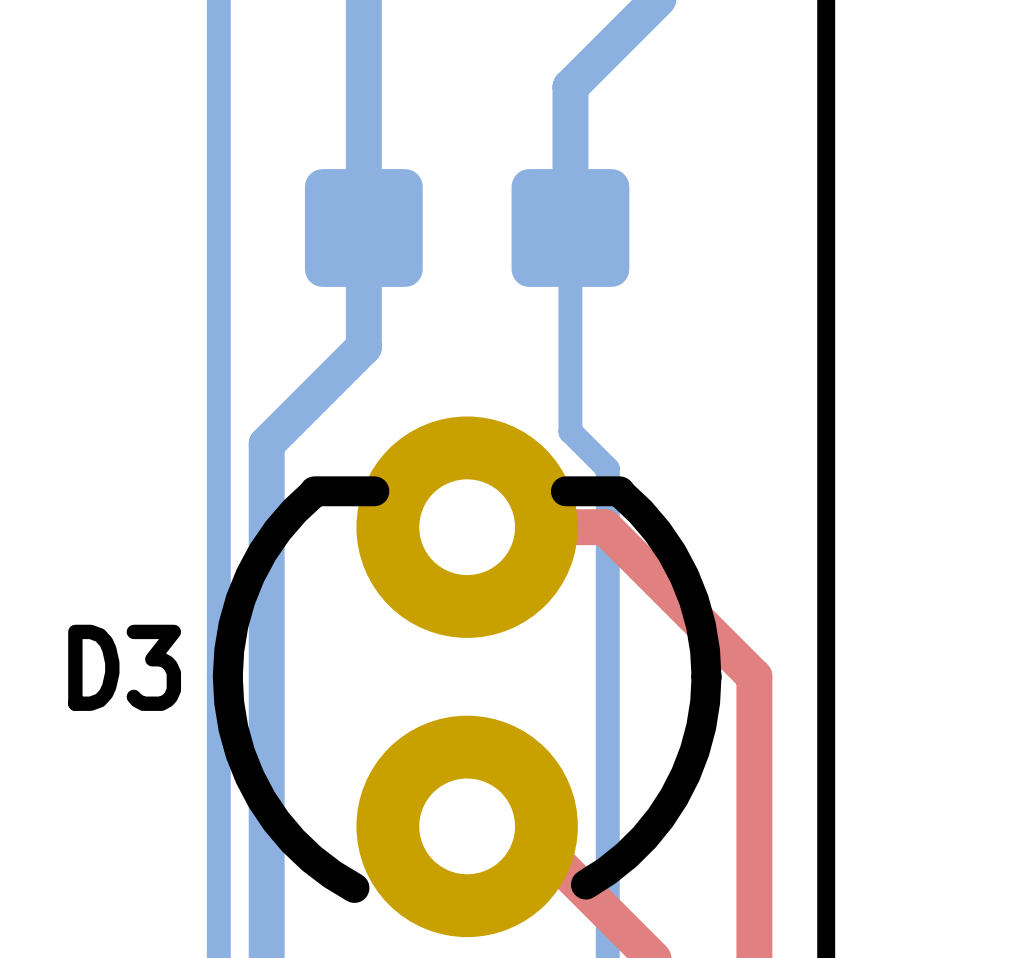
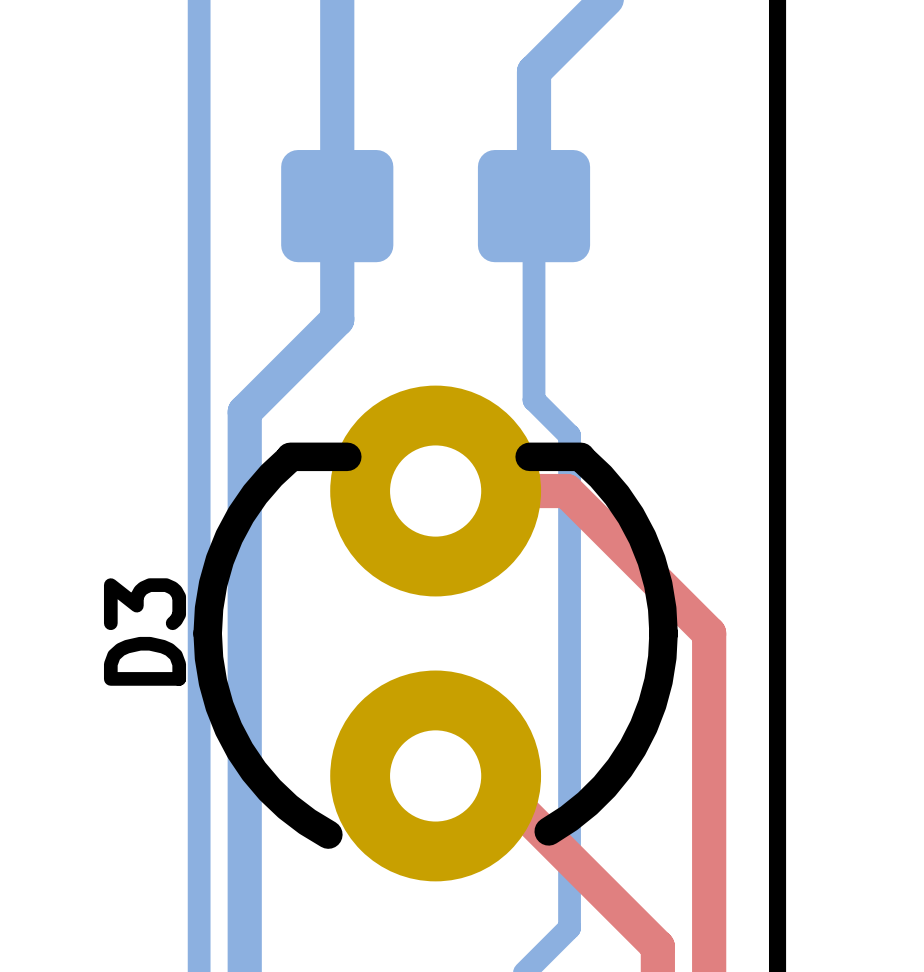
D3 name rotation: 0° (124, 667) -> 90° counterclockwise (145, 632)

